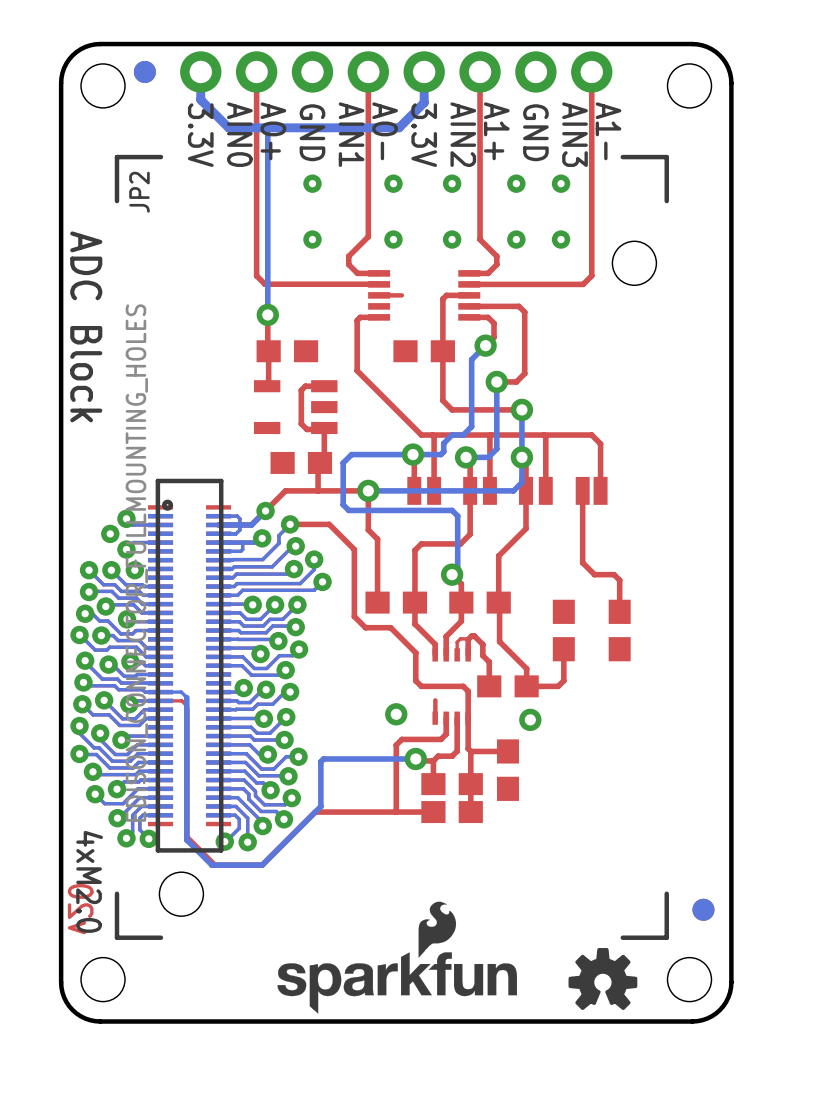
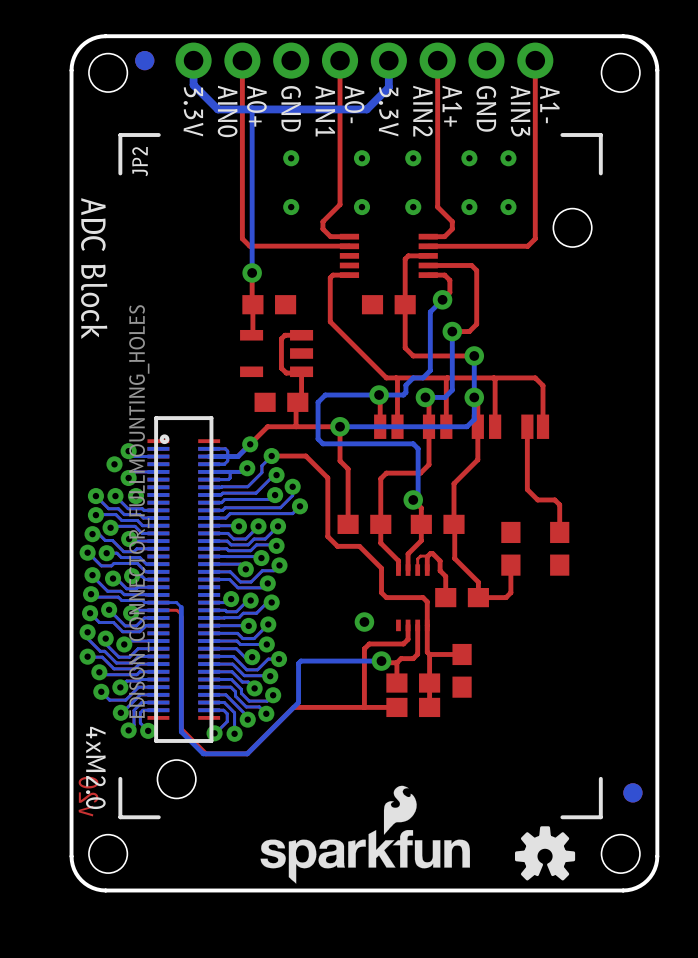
top track: (401, 295) (379, 295) -> none
top track: (435, 700) (435, 718) -> none
via: (530, 719) -> none

